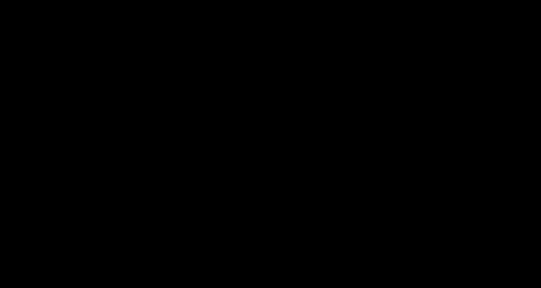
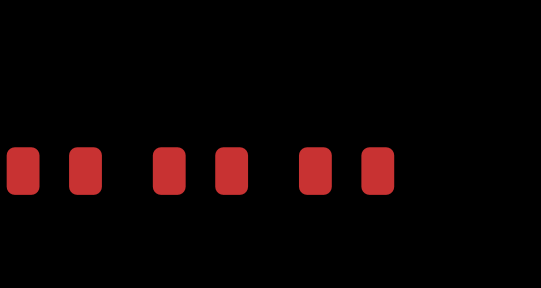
part: none -> (54, 171)
part: none -> (200, 171)
part: none -> (346, 171)

